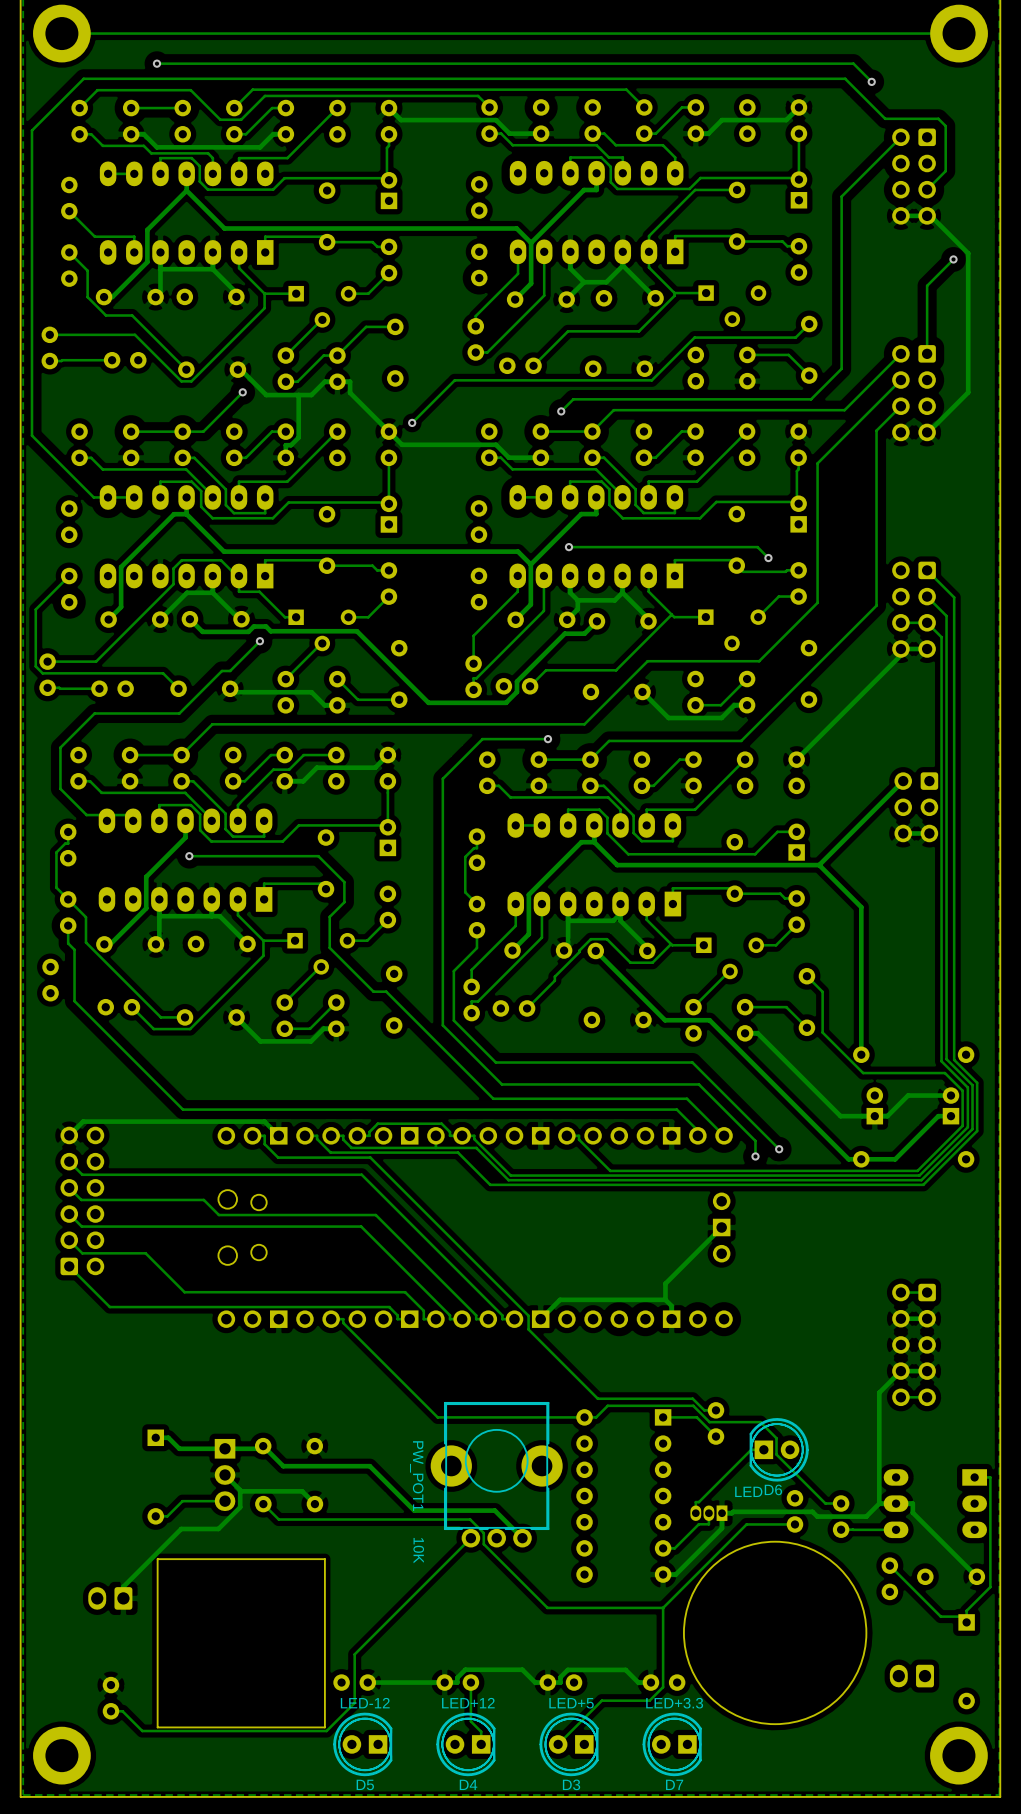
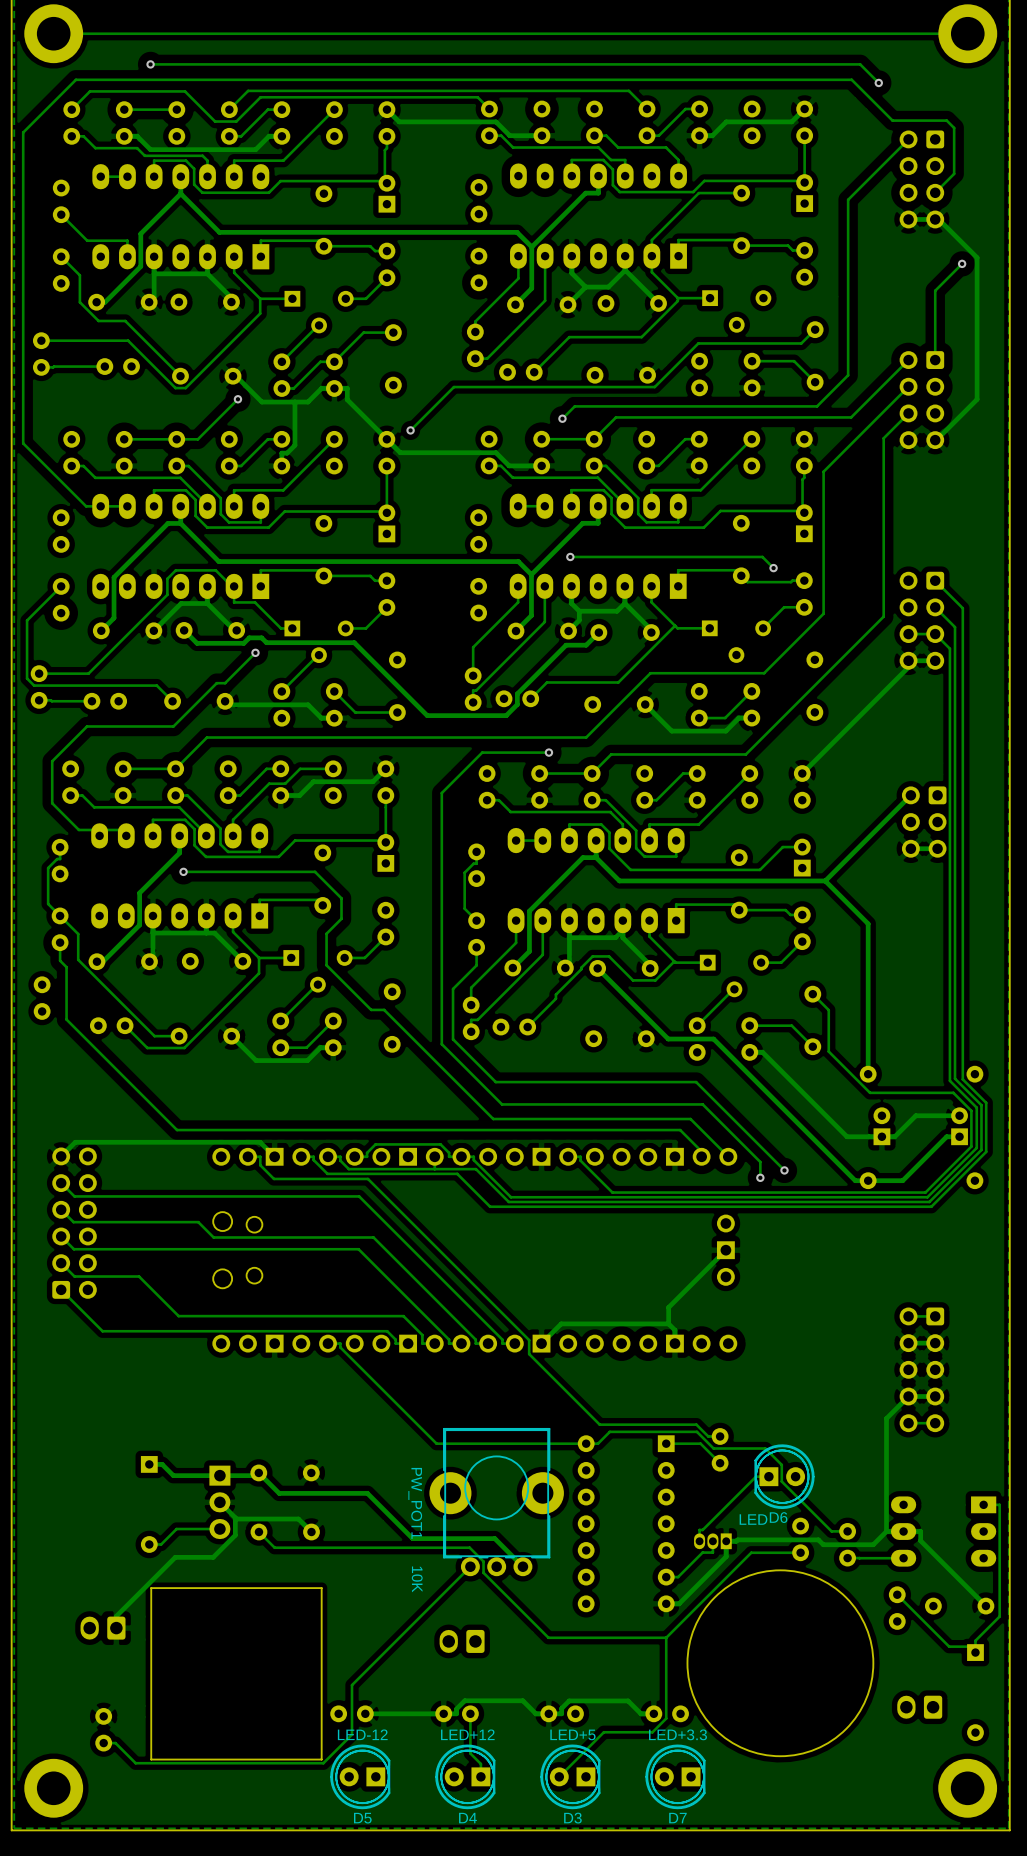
part: none -> (462, 1641)

